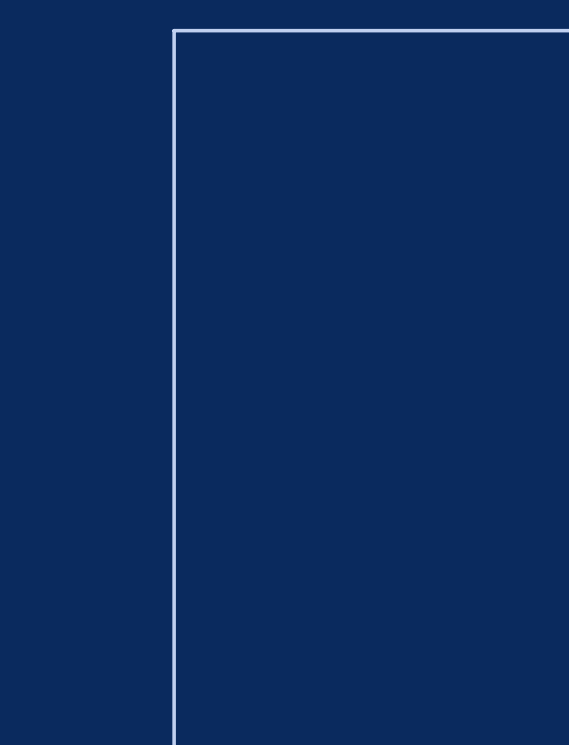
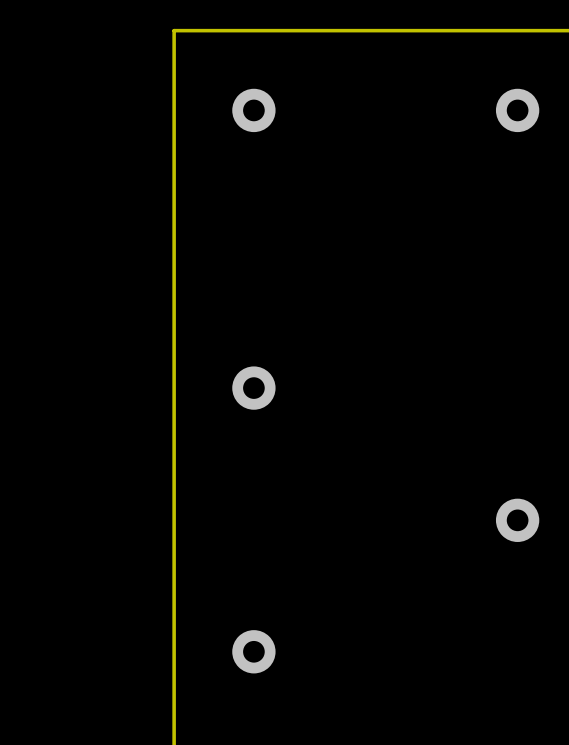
via: none -> (253, 110)
via: none -> (517, 110)
via: none -> (253, 388)
via: none -> (517, 520)
via: none -> (253, 651)

